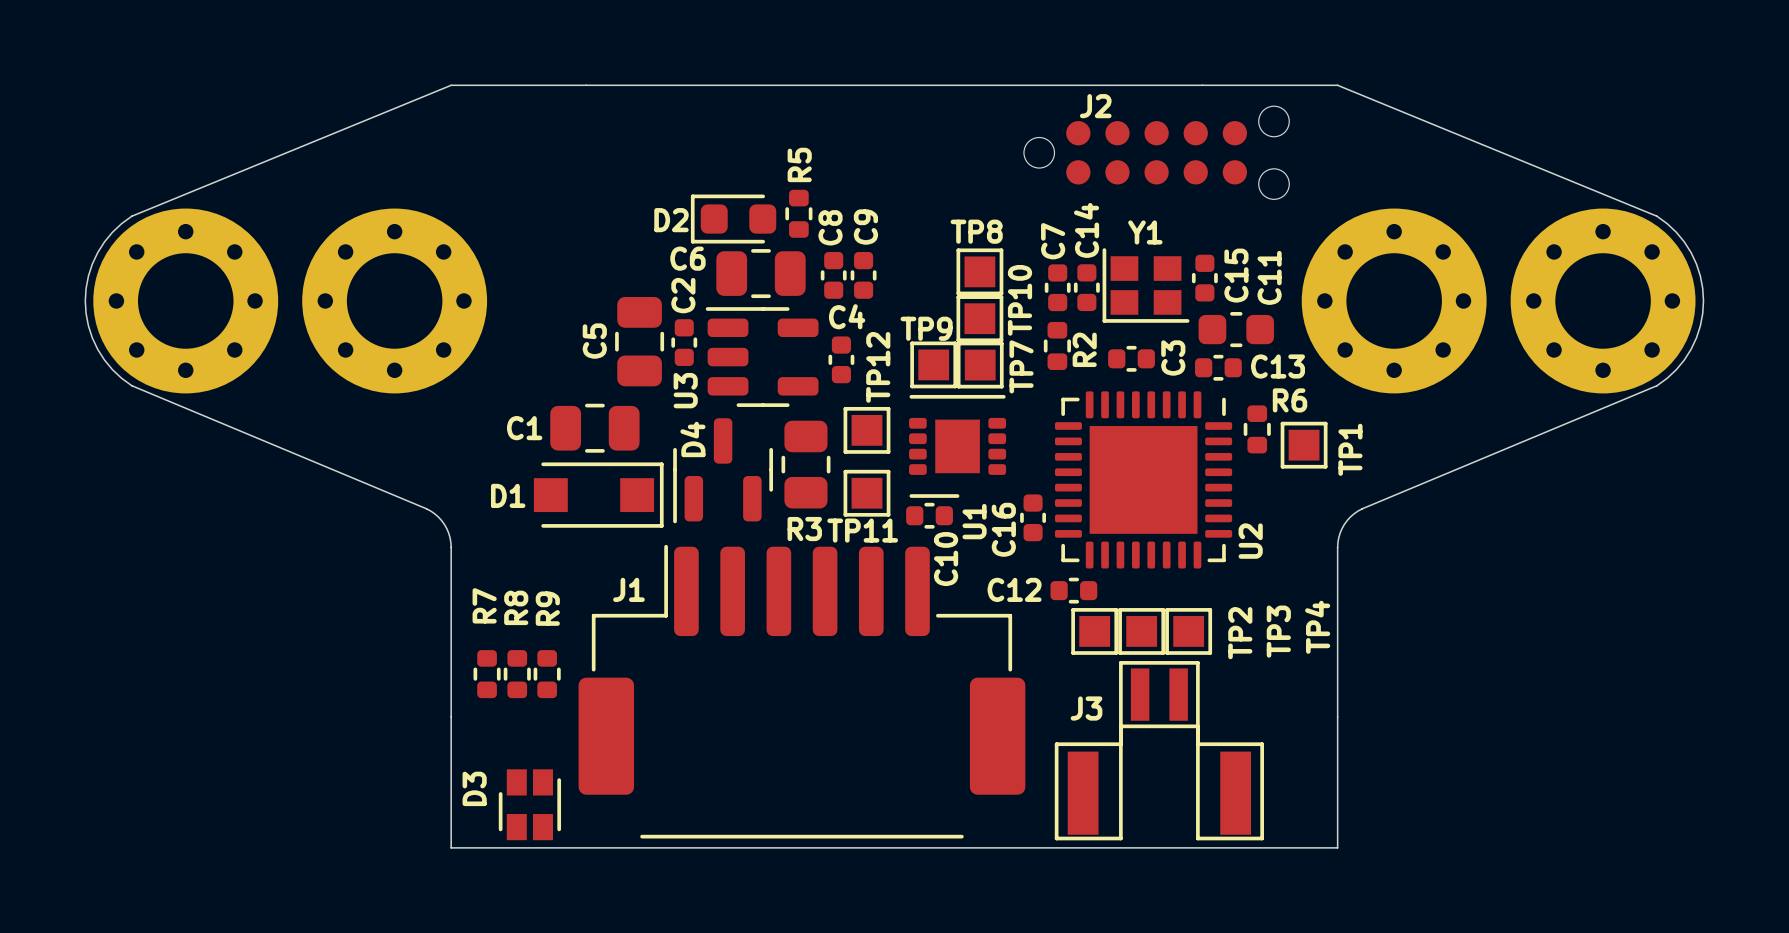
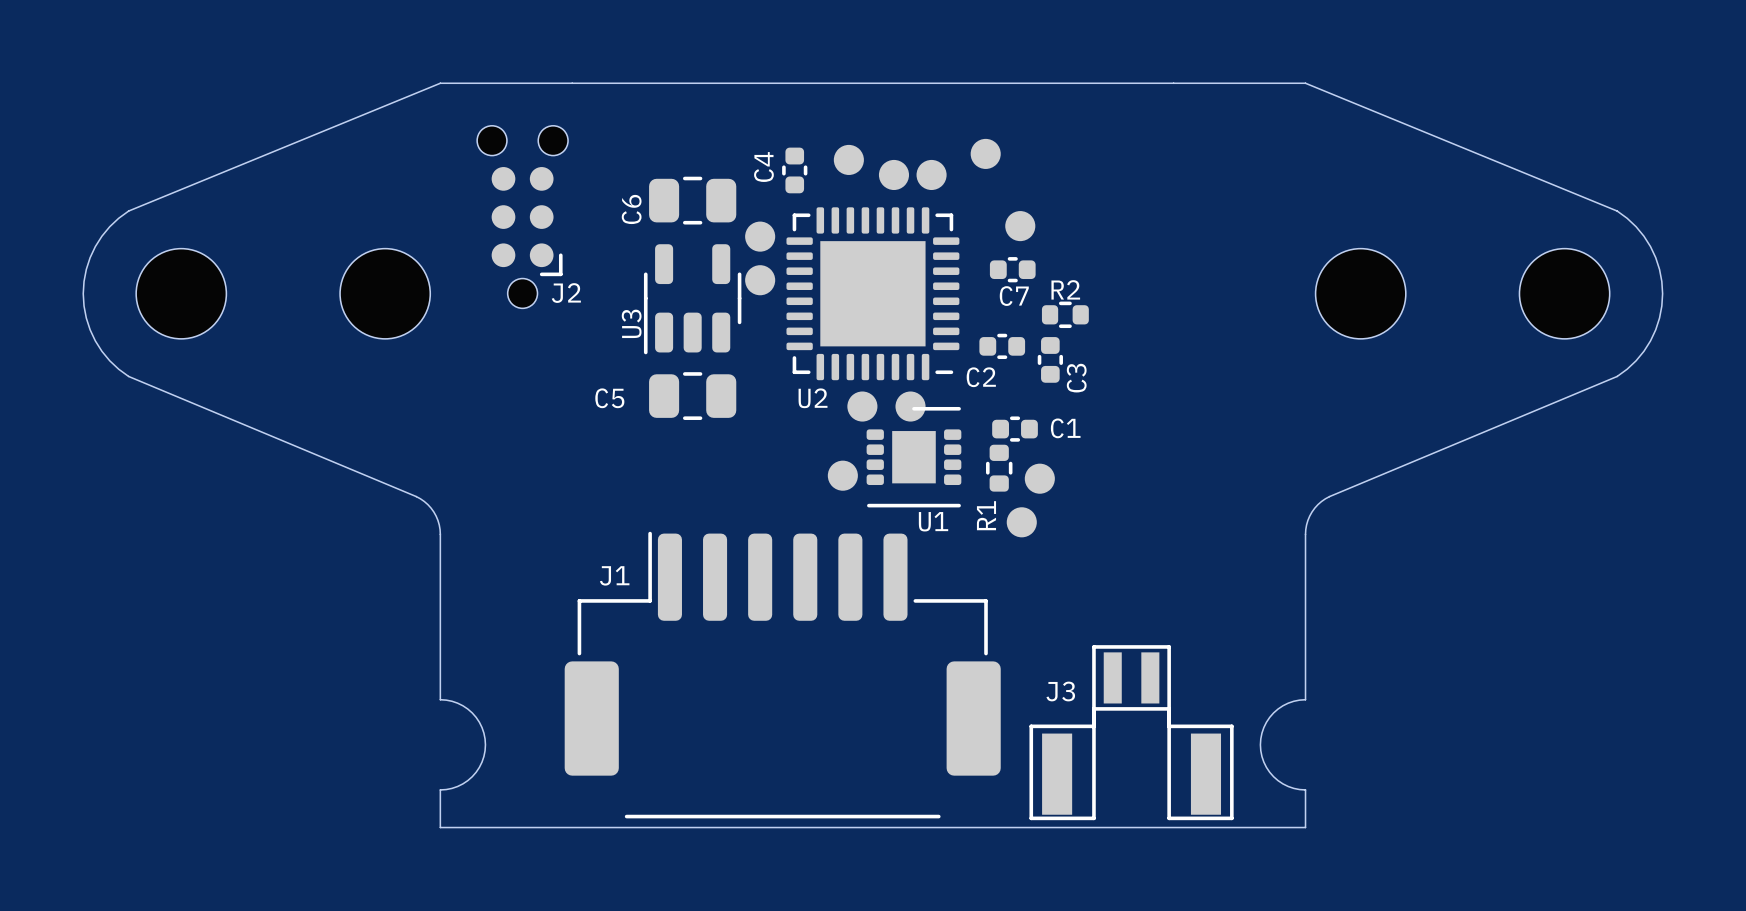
J2 footprint: [1023, 106, 1290, 200] -> [477, 125, 569, 309]
J2 name position: J2 (1095, 106) -> J2 (566, 293)
part: none -> (985, 153)
part: none -> (848, 159)
part: none -> (893, 174)
part: none -> (931, 174)
part footprint: [93, 208, 279, 394] -> [136, 248, 227, 339]
part footprint: [302, 208, 488, 394] -> [340, 248, 431, 339]
part footprint: [1301, 208, 1487, 394] -> [1315, 248, 1406, 339]
part footprint: [1510, 208, 1696, 394] -> [1519, 248, 1610, 339]
R5: (798, 213) -> none
D2: (733, 219) -> none
part: none -> (1020, 226)
part: none -> (760, 236)
C6 name rotation: 0° (687, 258) -> 90° counterclockwise (631, 209)
TP8: (979, 271) -> none
C6 position: (760, 273) -> (692, 200)
C8: (833, 275) -> none
C9: (863, 275) -> none
C15: (1204, 278) -> none
Y1: (1146, 285) -> none
part: none -> (760, 280)
C7 rotation: 0° (1057, 287) -> 90° clockwise (1012, 269)
C14: (1086, 287) -> none
C2 name position: C2 (683, 295) -> C2 (981, 377)
C4 name rotation: 0° (847, 316) -> 90° counterclockwise (763, 167)
C4 name position: C4 (847, 316) -> C4 (763, 167)
TP10: (979, 318) -> none
C11: (1236, 329) -> none
C5 rotation: 0° (639, 341) -> 90° clockwise (692, 396)
C5 position: (639, 341) -> (692, 396)
C2 rotation: 0° (684, 342) -> 90° clockwise (1002, 346)
C2 position: (684, 342) -> (1002, 346)
R2 rotation: 0° (1057, 345) -> 90° clockwise (1065, 314)
R2 position: (1057, 345) -> (1065, 314)
U3 rotation: 0° (762, 357) -> 90° counterclockwise (692, 299)
U3 position: (762, 357) -> (692, 299)
C3 rotation: 0° (1131, 358) -> 90° clockwise (1050, 359)
C3 position: (1131, 358) -> (1050, 359)
C4 position: (841, 359) -> (794, 170)
TP9: (933, 364) -> none
TP7: (980, 365) -> none
C13: (1218, 367) -> none
C1 footprint: [550, 403, 640, 453] -> [992, 416, 1038, 442]
part: none -> (862, 406)
part: none -> (910, 406)
C1 name position: C1 (524, 428) -> C1 (1065, 428)
R6: (1257, 429) -> none
TP12: (866, 430) -> none
TP1: (1304, 445) -> none
U1 rotation: 0° (957, 446) -> 180° (913, 457)
R3: (805, 464) -> none
D4: (723, 470) -> none
R1: none -> (999, 468)
U2 rotation: 0° (1143, 479) -> 90° clockwise (872, 293)
U2 position: (1143, 479) -> (872, 293)
part: none -> (842, 475)
part: none -> (1039, 478)
TP11: (866, 493) -> none
D1: (598, 495) -> none
C10: (929, 515) -> none
C16: (1033, 517) -> none
part: none -> (1021, 522)
C12: (1073, 590) -> none
TP2: (1094, 631) -> none
TP3: (1141, 631) -> none
TP4: (1188, 631) -> none
R7: (487, 674) -> none
R8: (517, 674) -> none
R9: (547, 674) -> none
board edge: (451, 716) (451, 809) -> (440, 699) (457, 703) (472, 712) (482, 727) (485, 744) (482, 762) (472, 776) (457, 786) (440, 789)
board edge: (1337, 716) (1337, 809) -> (1305, 699) (1288, 703) (1273, 712) (1263, 727) (1260, 744) (1263, 762) (1273, 776) (1288, 786) (1305, 789)
D3: (529, 804) -> none

